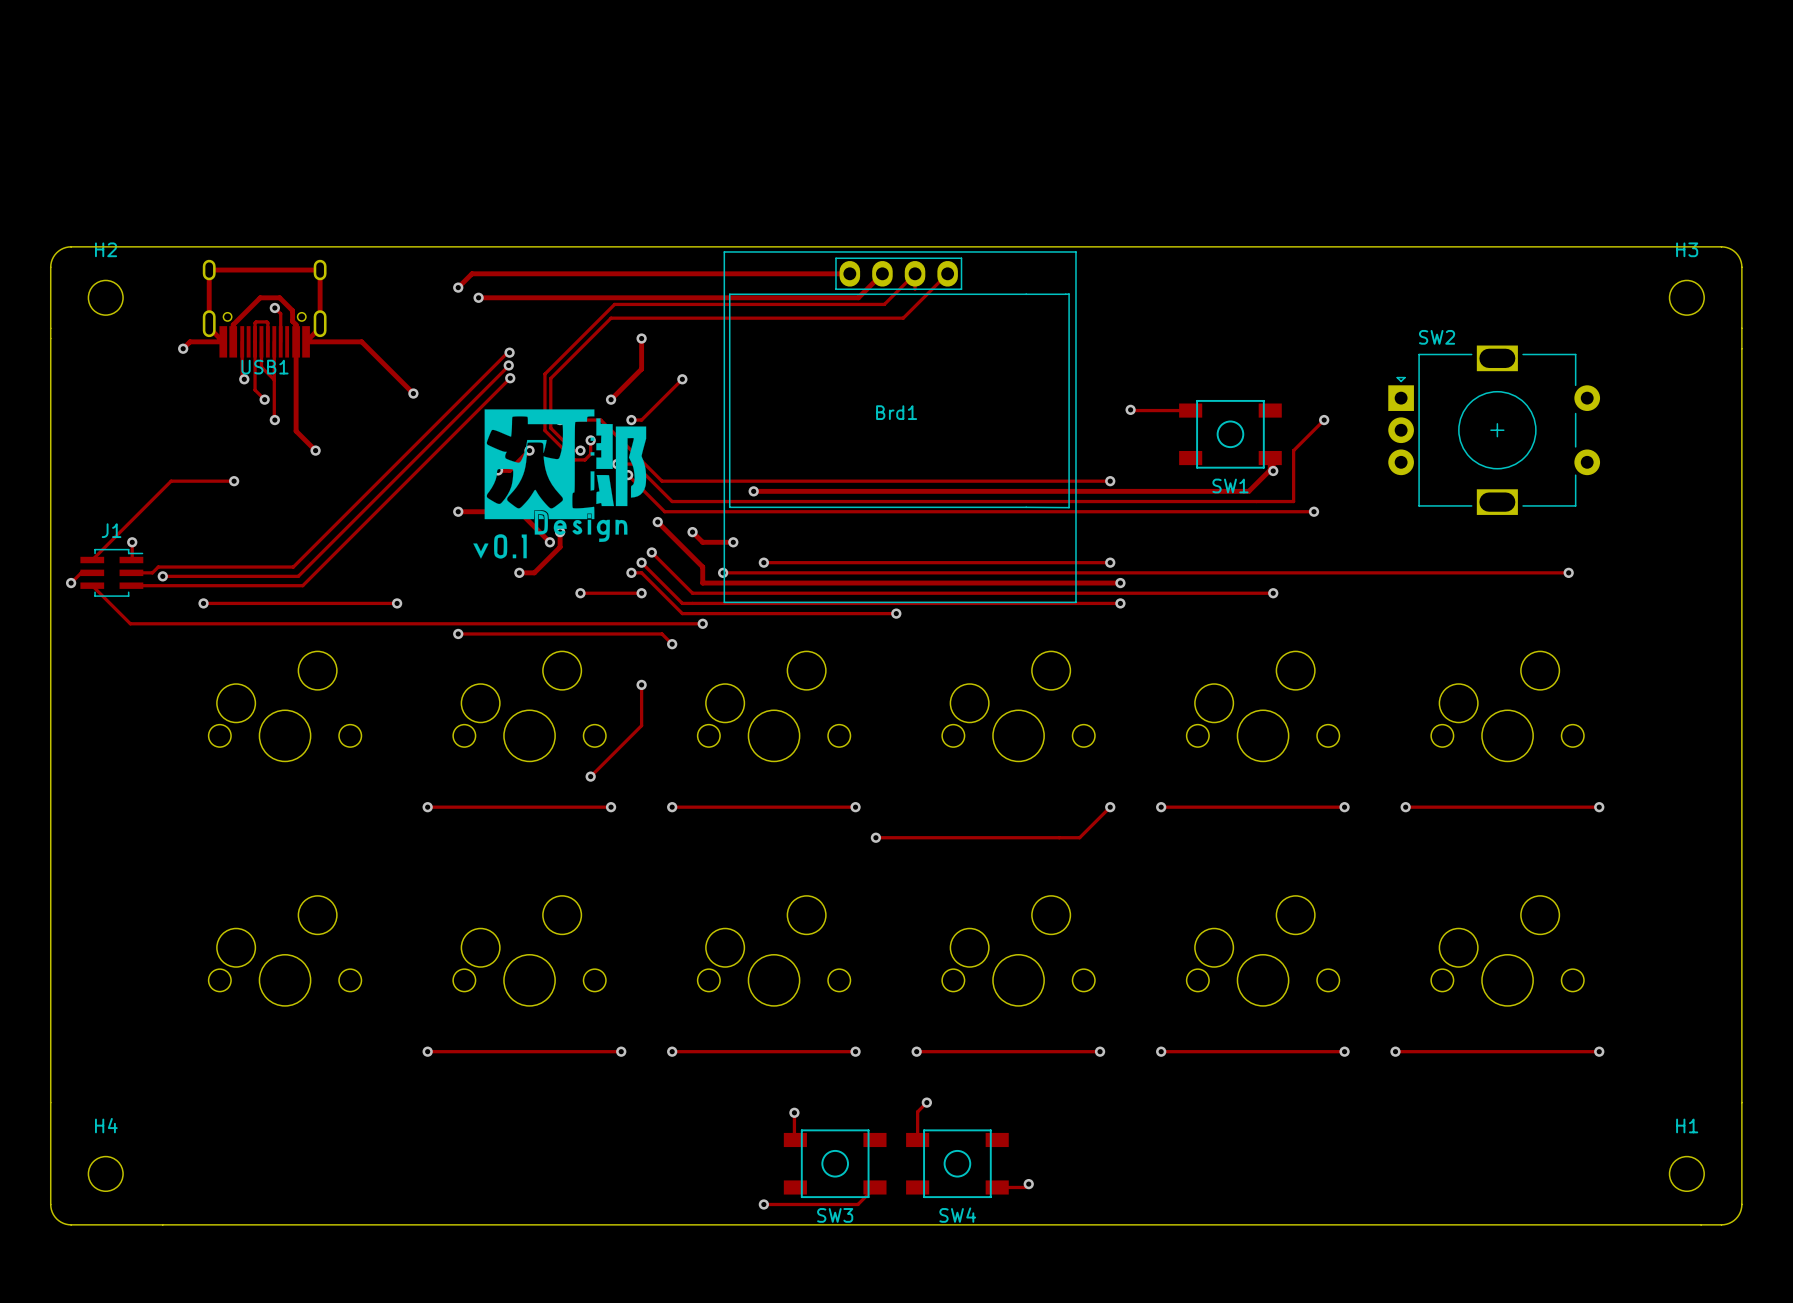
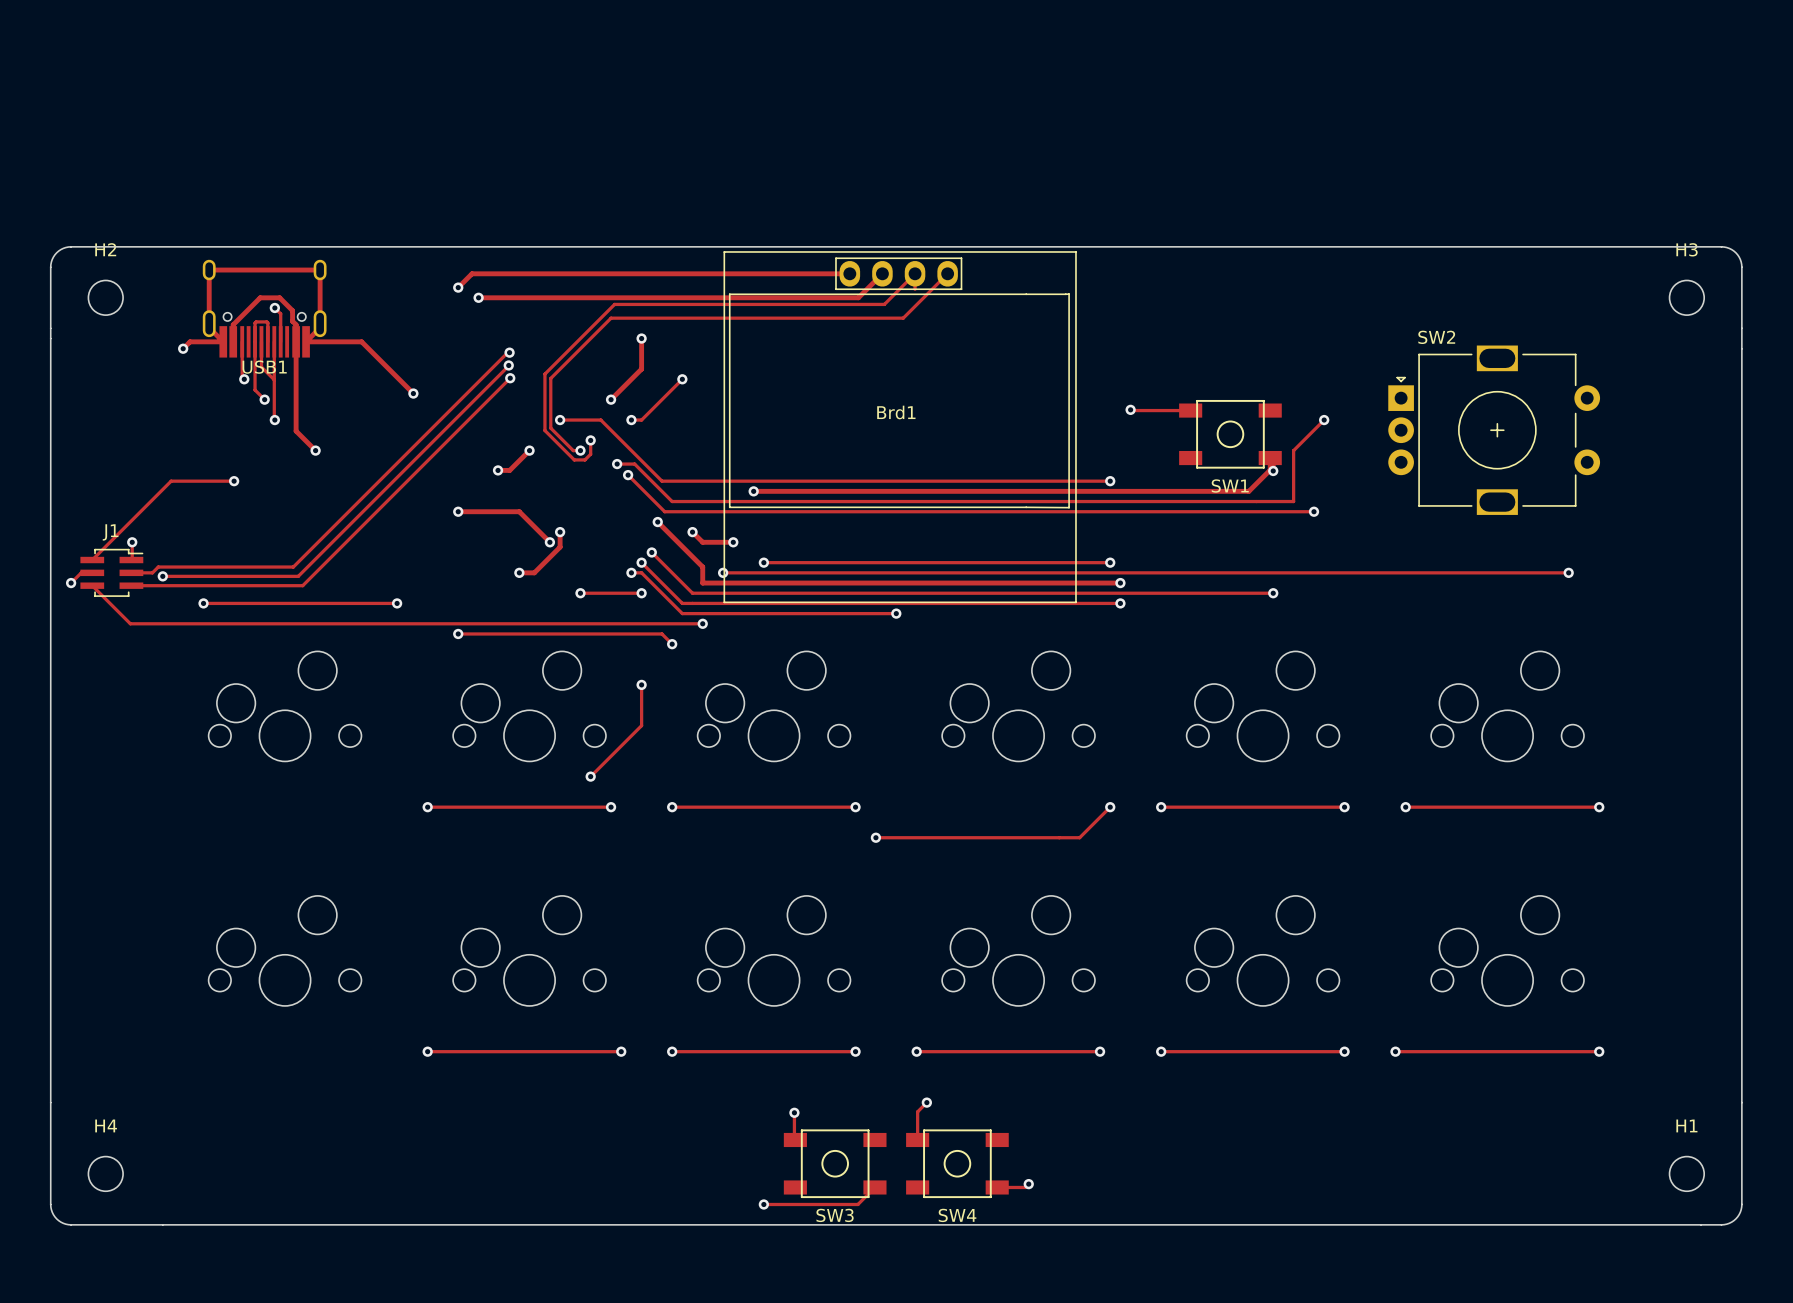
drawing: [473, 409, 647, 559] -> none

